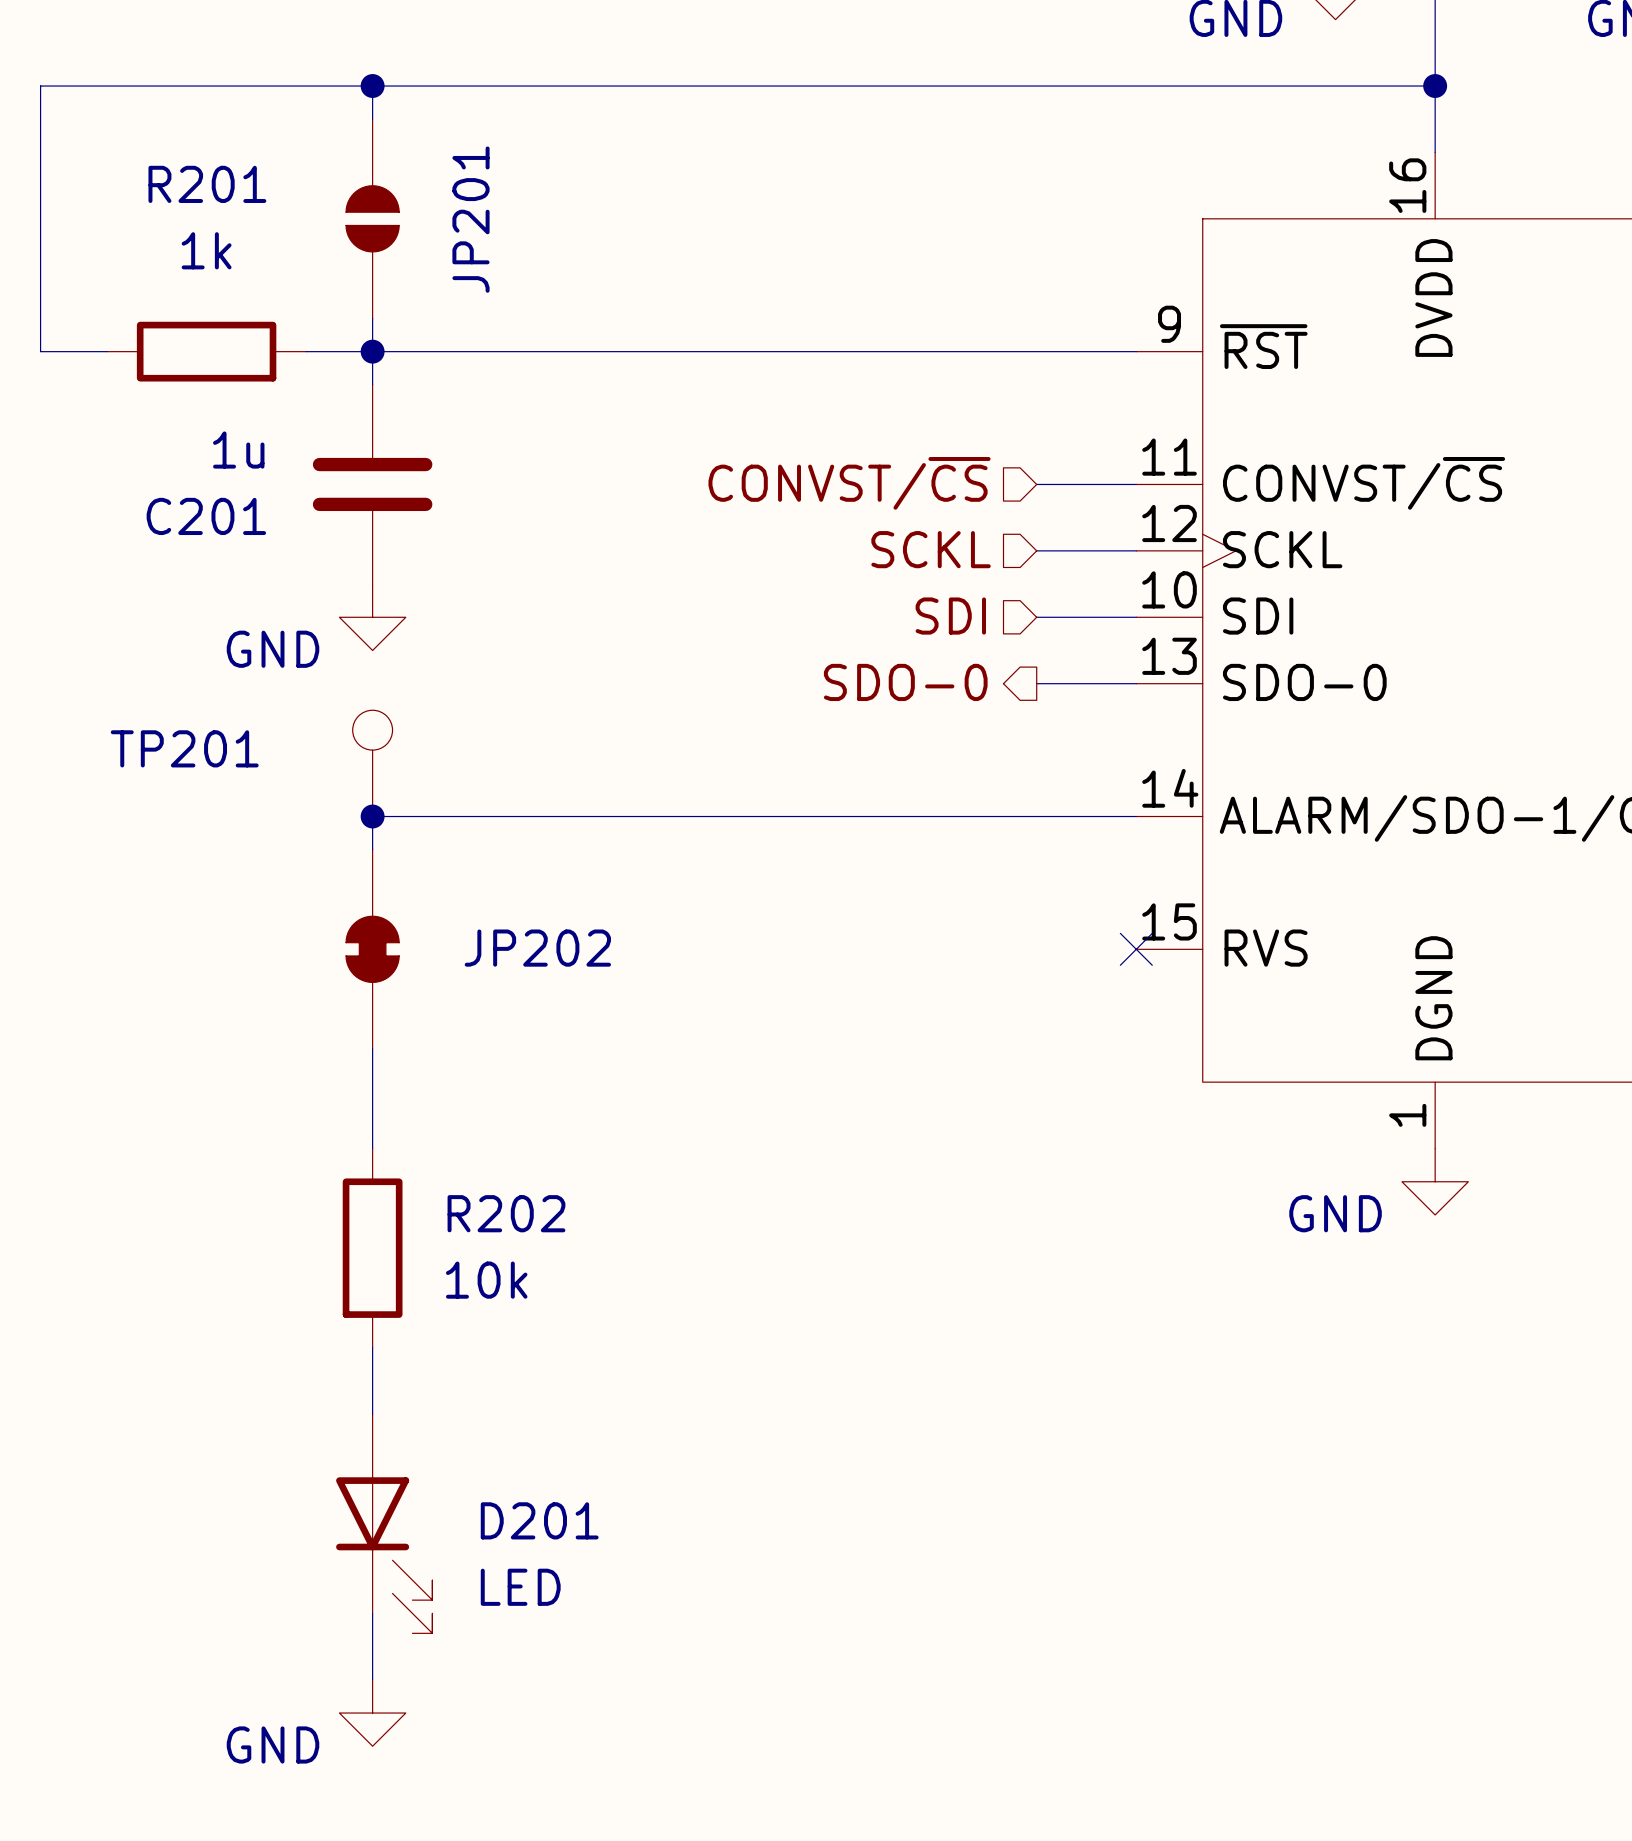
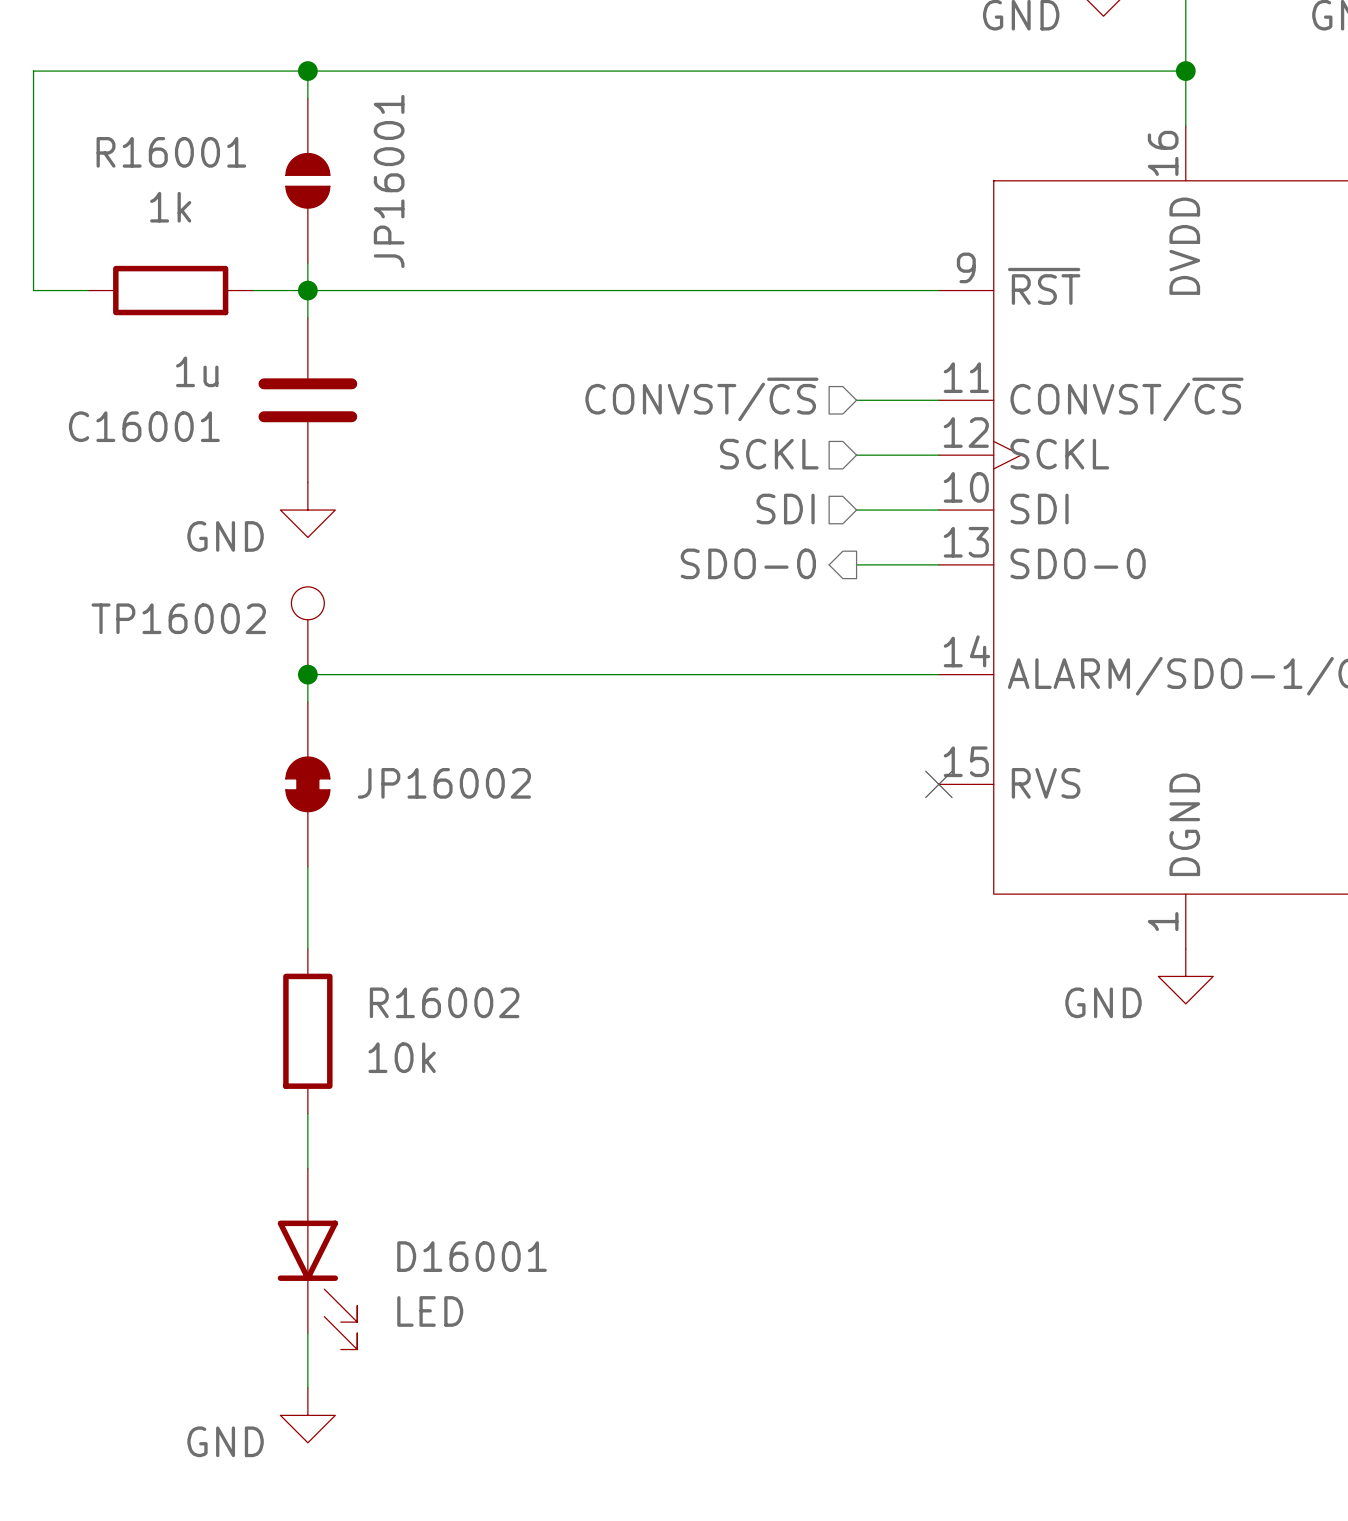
R201 name: R201 (207, 184) -> R16001 (171, 152)
JP201 name: JP201 (470, 219) -> JP16001 (389, 181)
C201 name: C201 (206, 516) -> C16001 (144, 426)
TP201 name: TP201 (184, 748) -> TP16002 (178, 618)
JP202 name: JP202 (537, 948) -> JP16002 (444, 783)
R202 name: R202 (506, 1213) -> R16002 (444, 1002)
D201 name: D201 (539, 1520) -> D16001 (472, 1256)

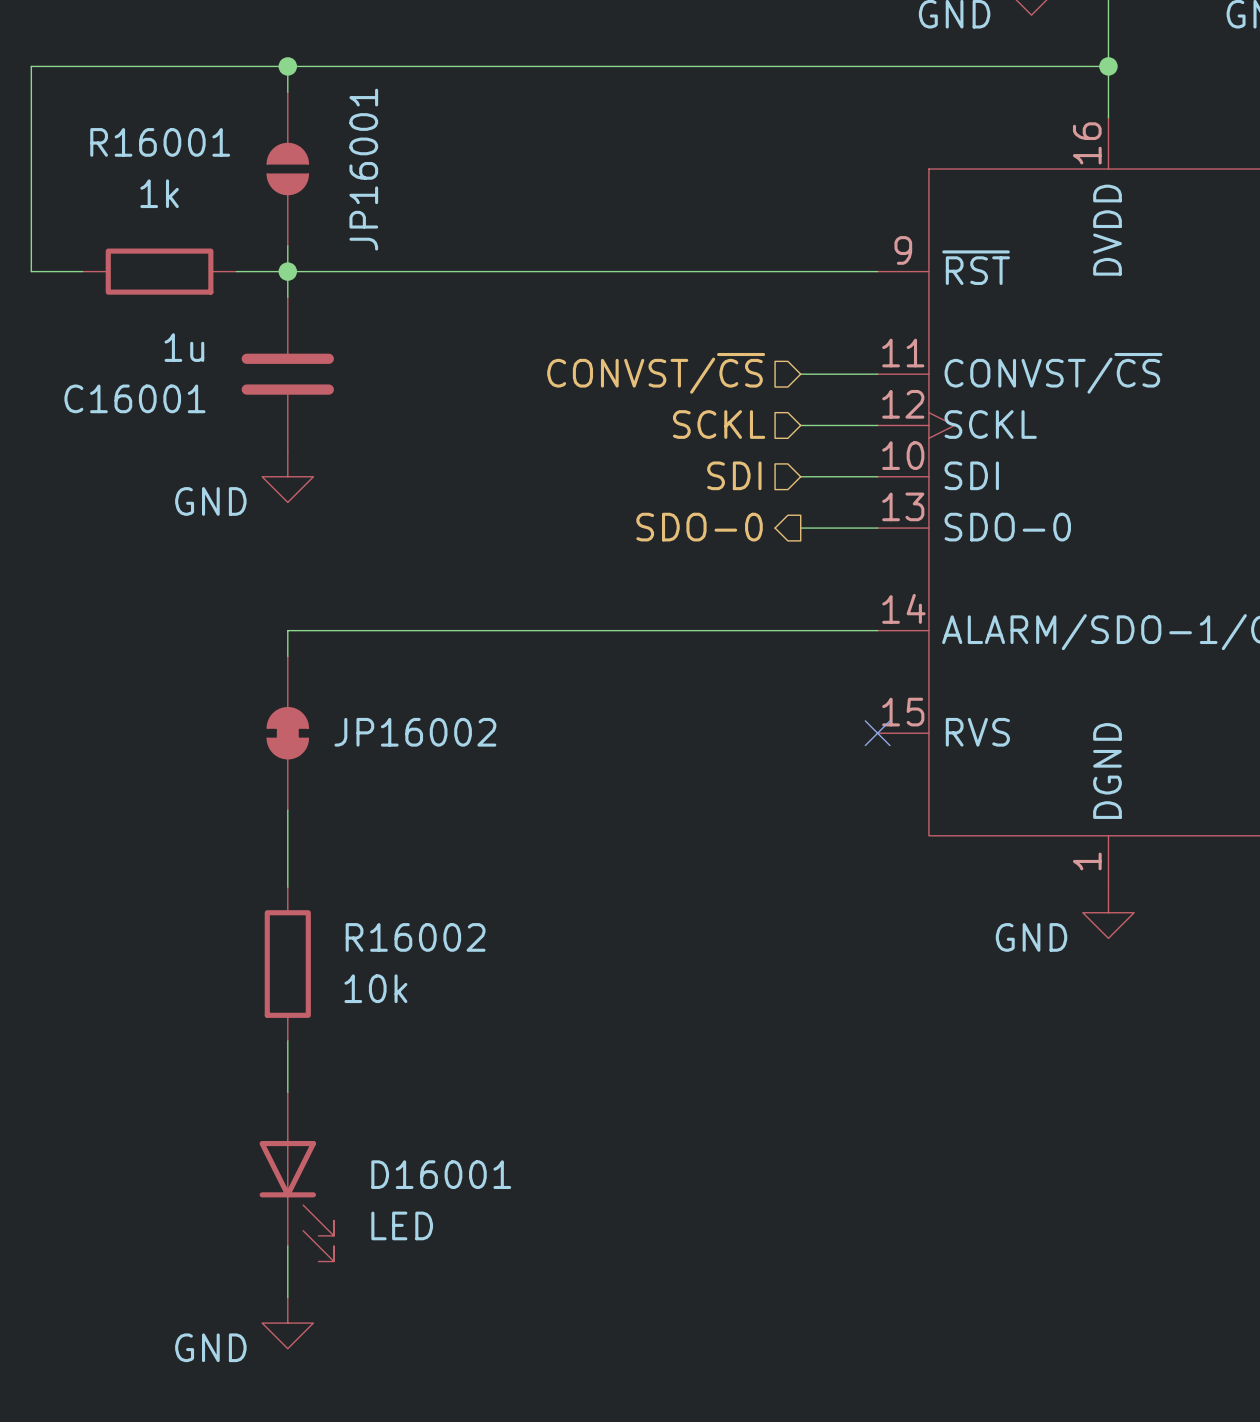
TP16002: (307, 630) -> none
junction: (307, 674) -> none

